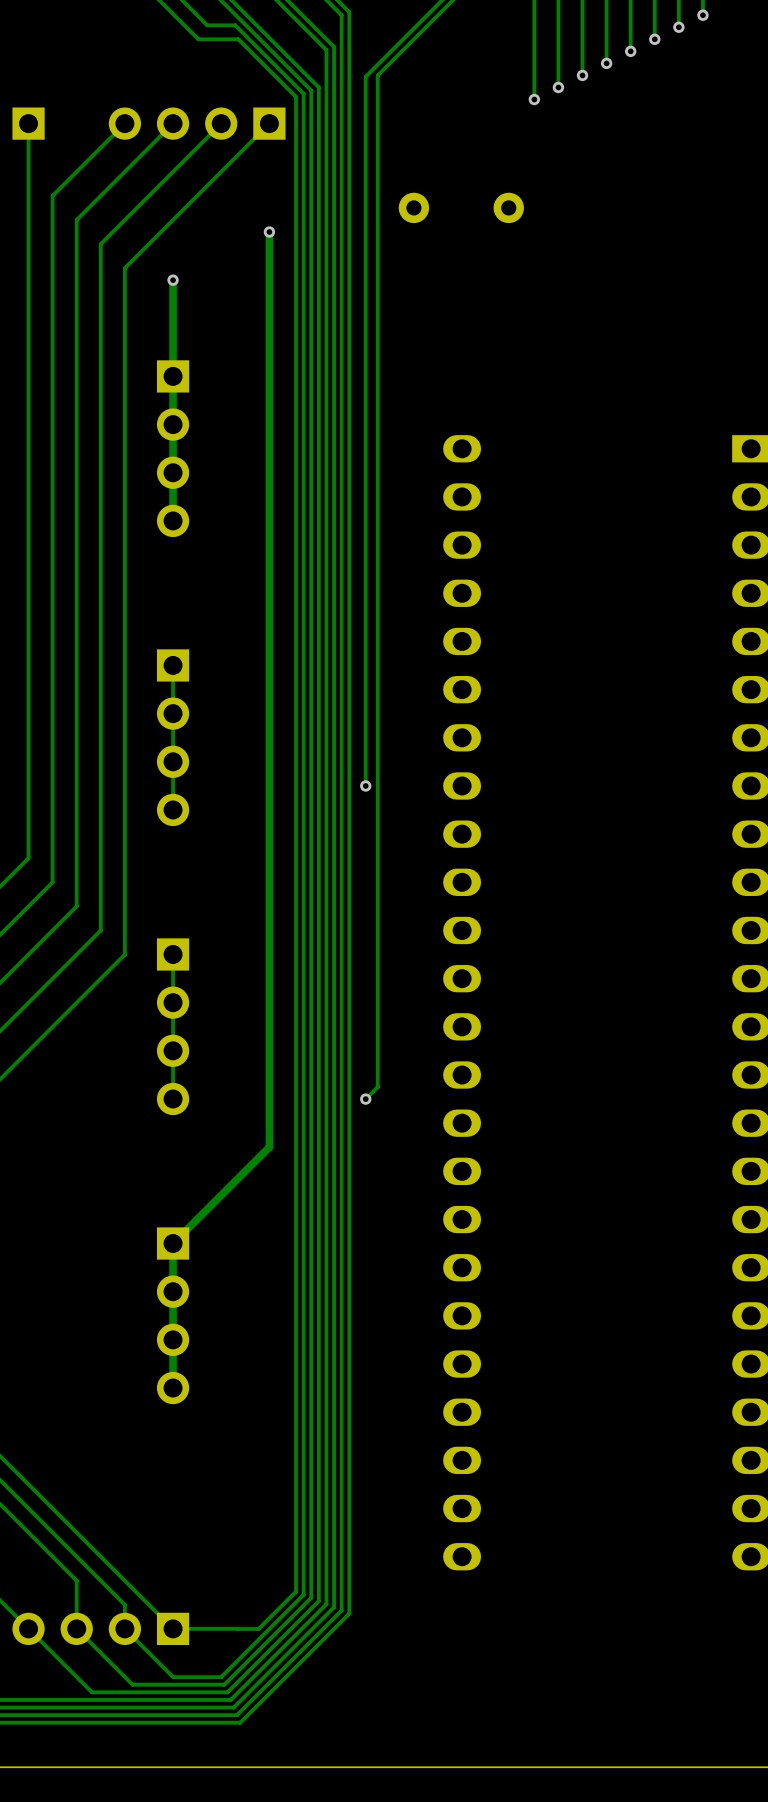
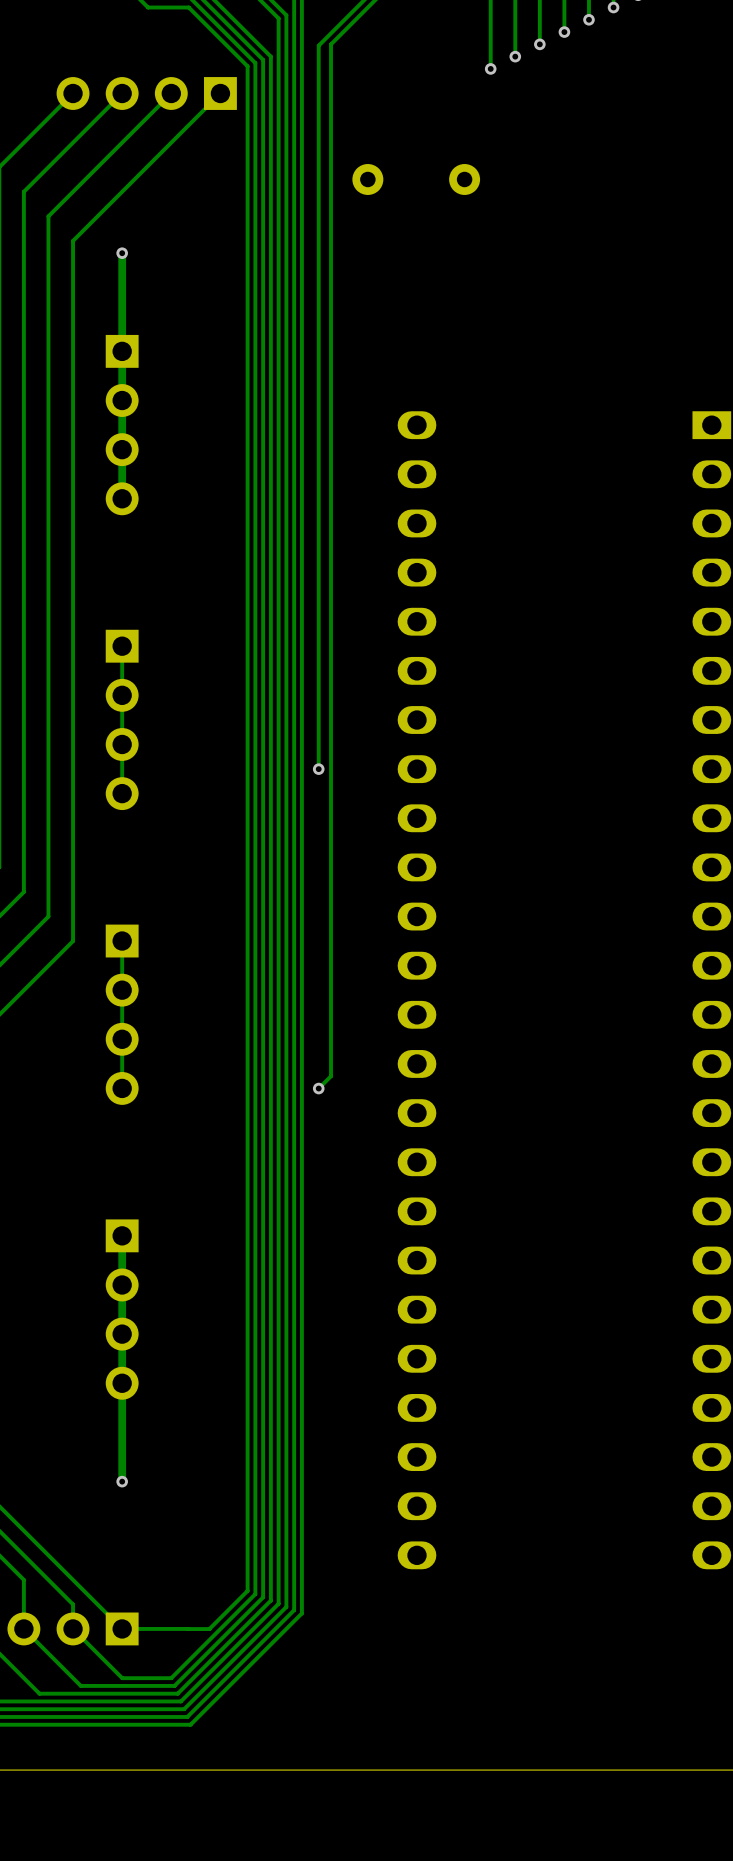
track: (269, 232) (269, 1147) (173, 1243) -> none
via: (269, 232) -> none
track: none -> (122, 1383) (122, 1481)
via: none -> (122, 1481)

